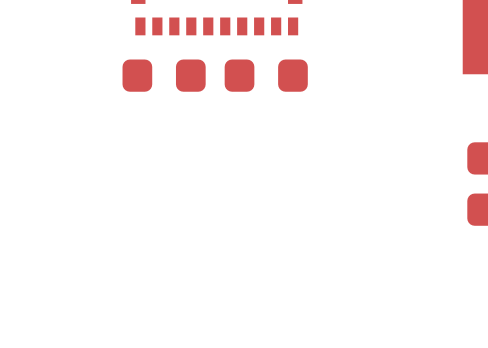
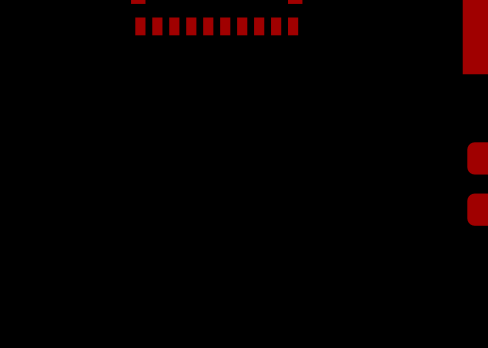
part: (164, 75) -> none
part: (266, 75) -> none

